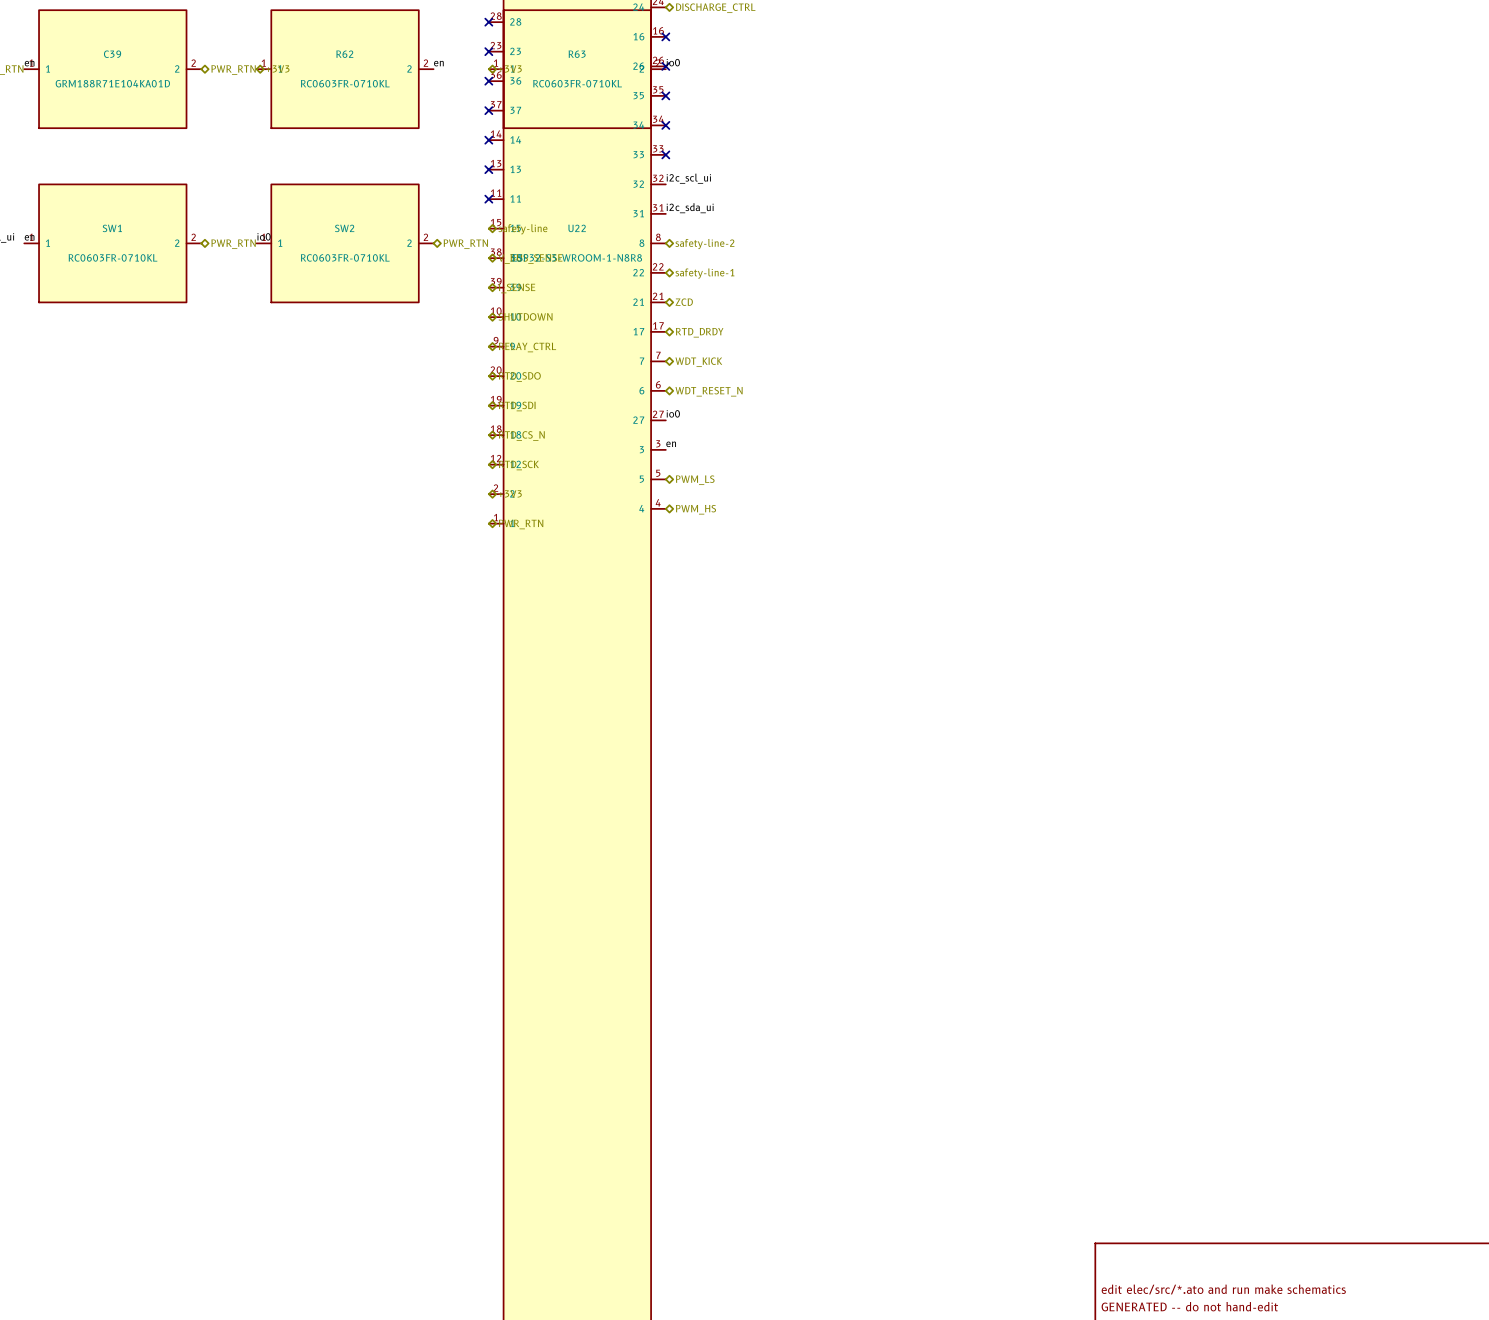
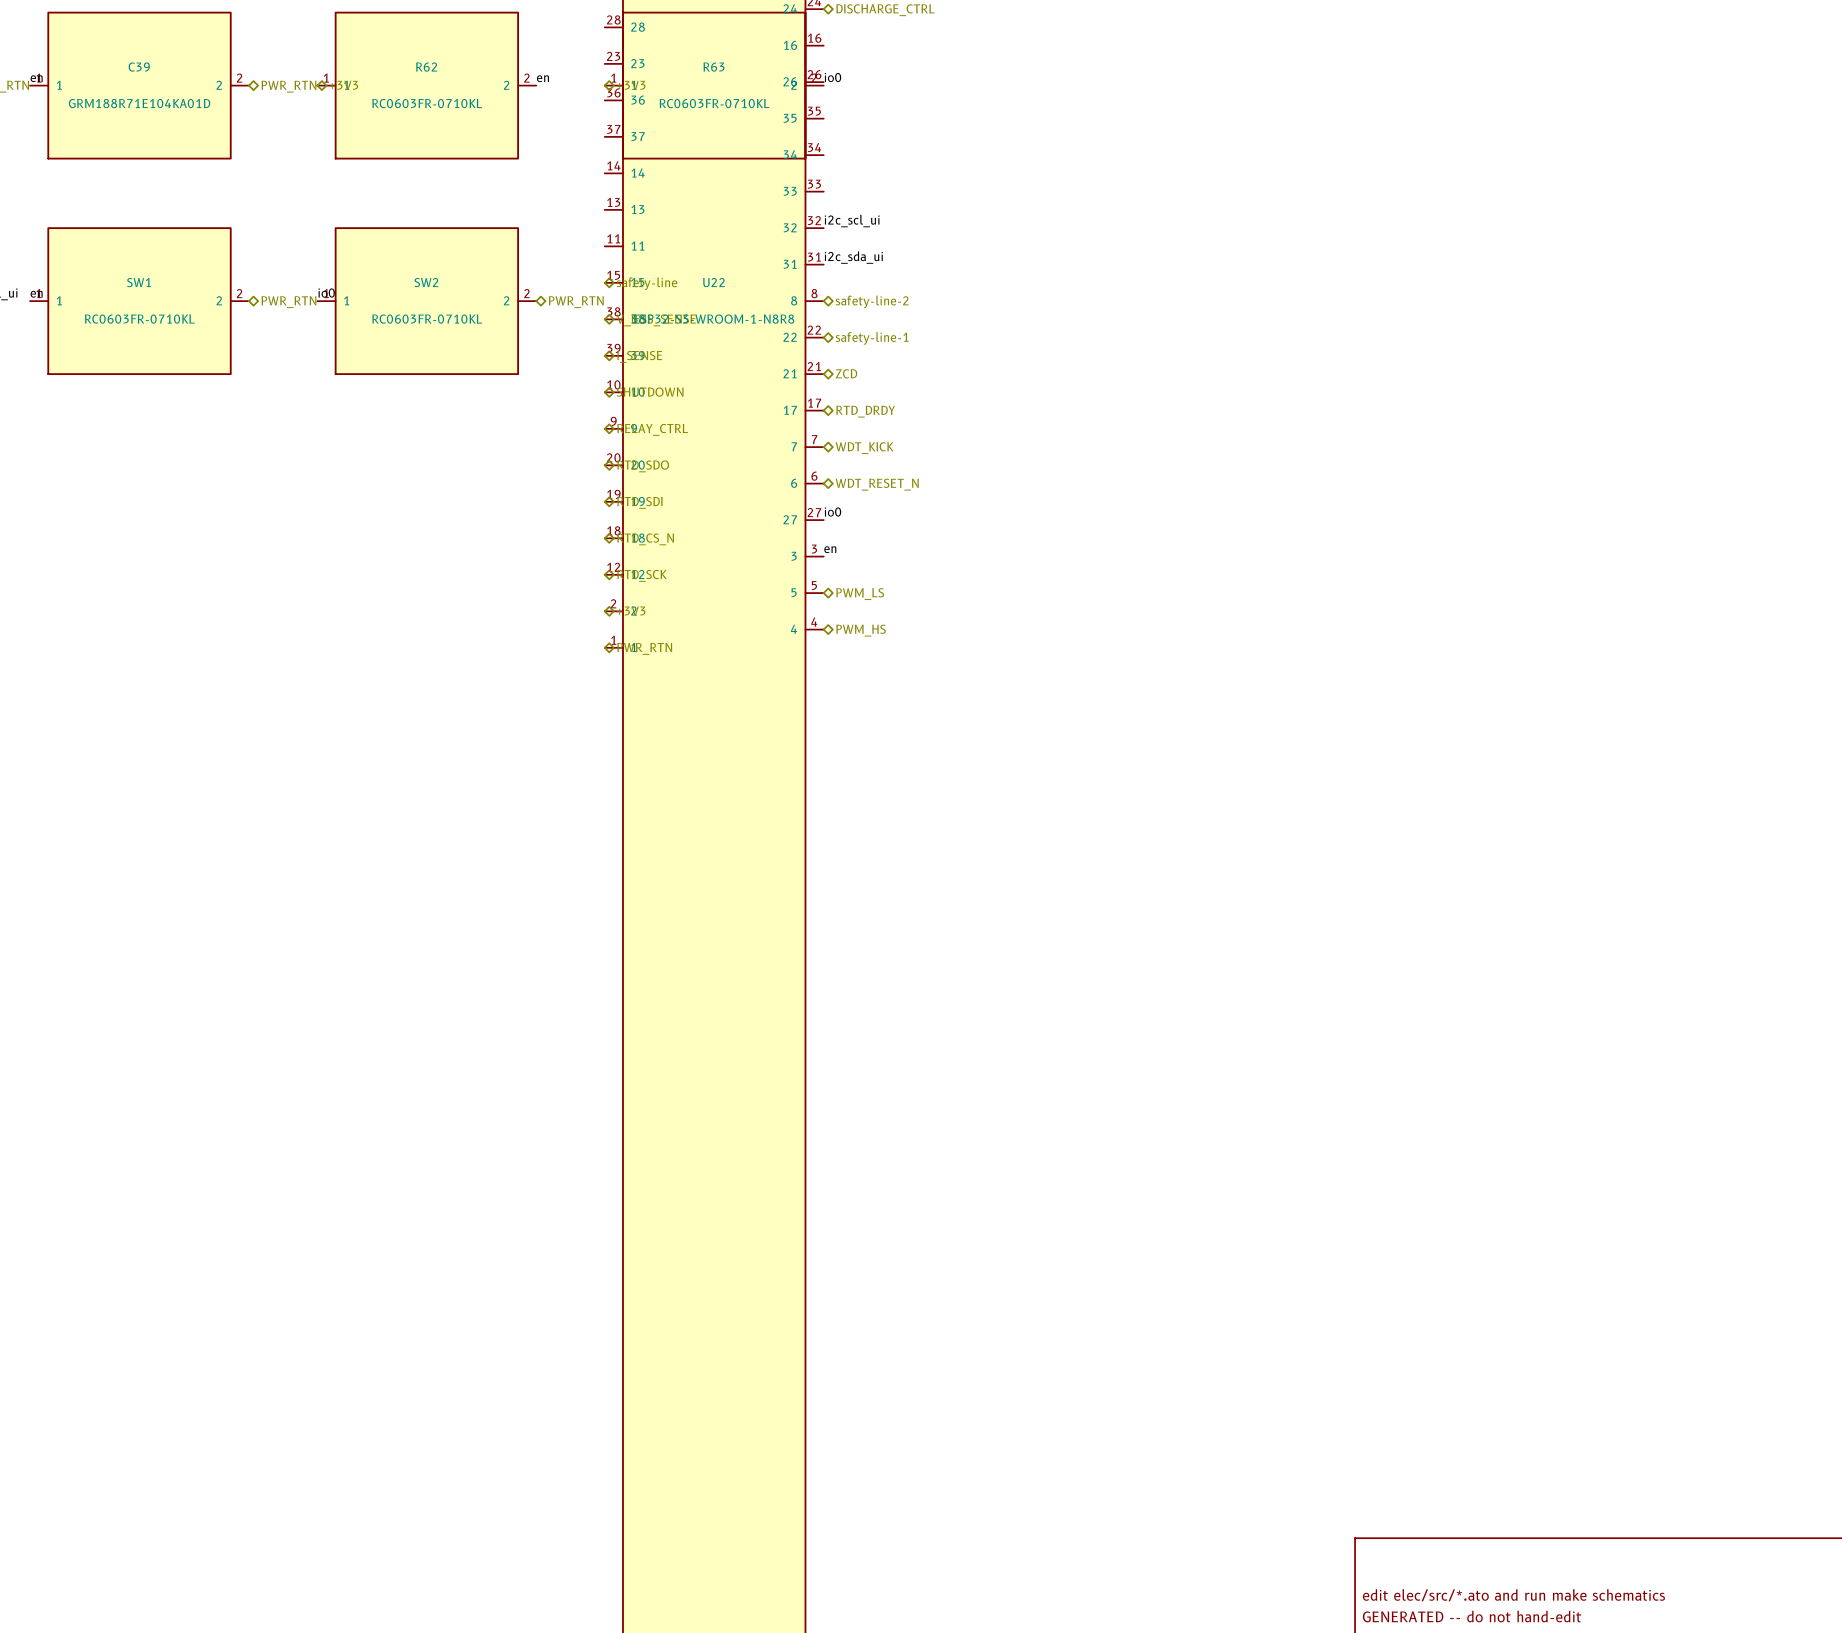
no-connect mark: (488, 22) -> none
no-connect mark: (665, 36) -> none
no-connect mark: (488, 51) -> none
no-connect mark: (665, 66) -> none
no-connect mark: (488, 81) -> none
no-connect mark: (665, 95) -> none
no-connect mark: (488, 110) -> none
no-connect mark: (665, 125) -> none
no-connect mark: (488, 140) -> none
no-connect mark: (665, 154) -> none
no-connect mark: (488, 169) -> none
no-connect mark: (488, 199) -> none

